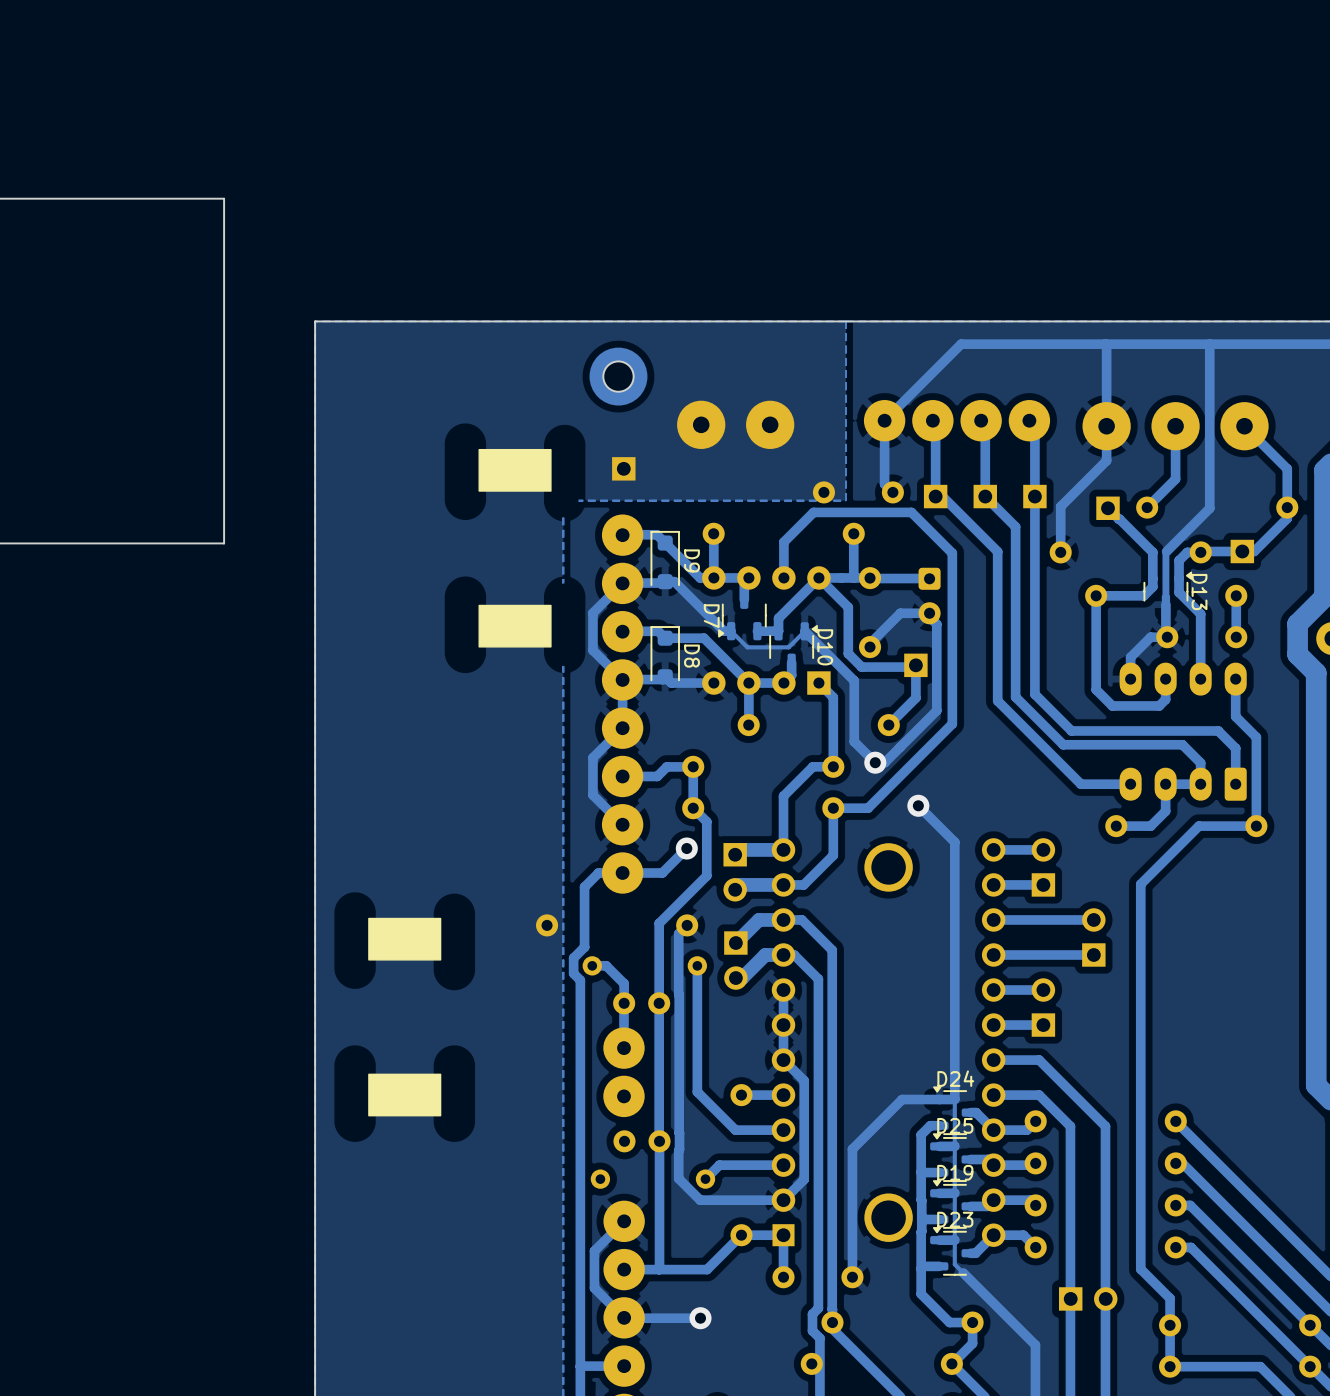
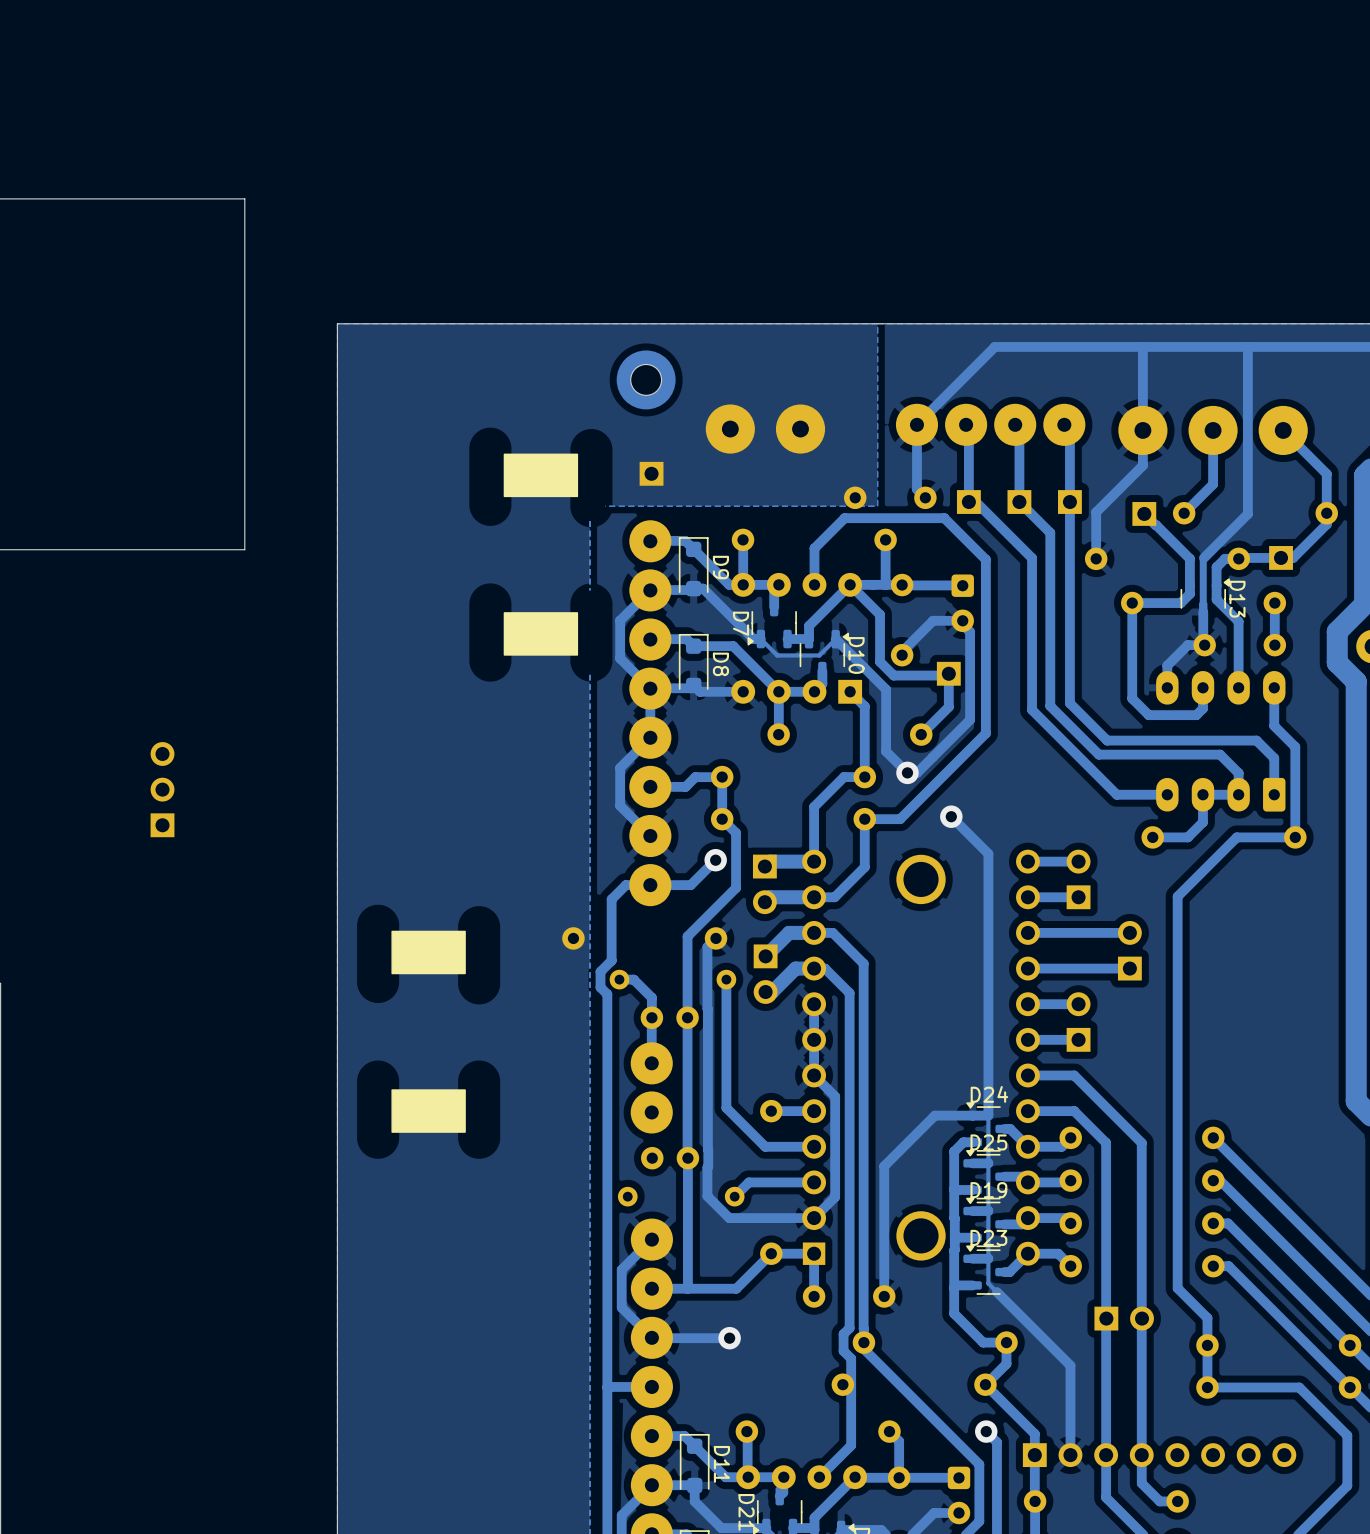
part: none -> (162, 789)

